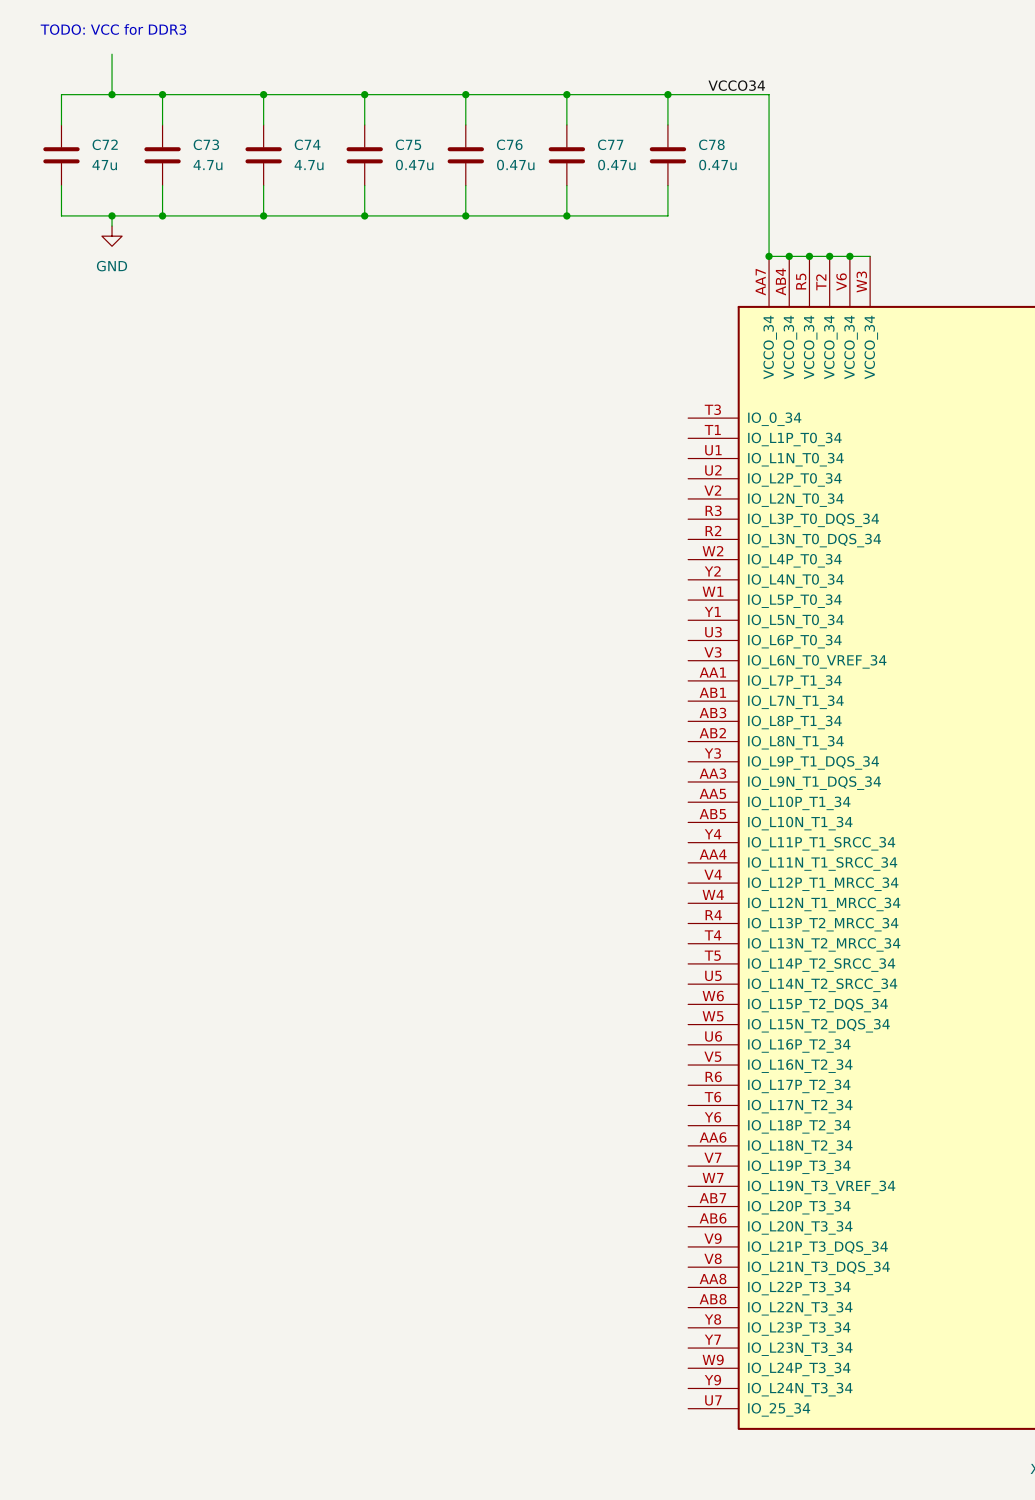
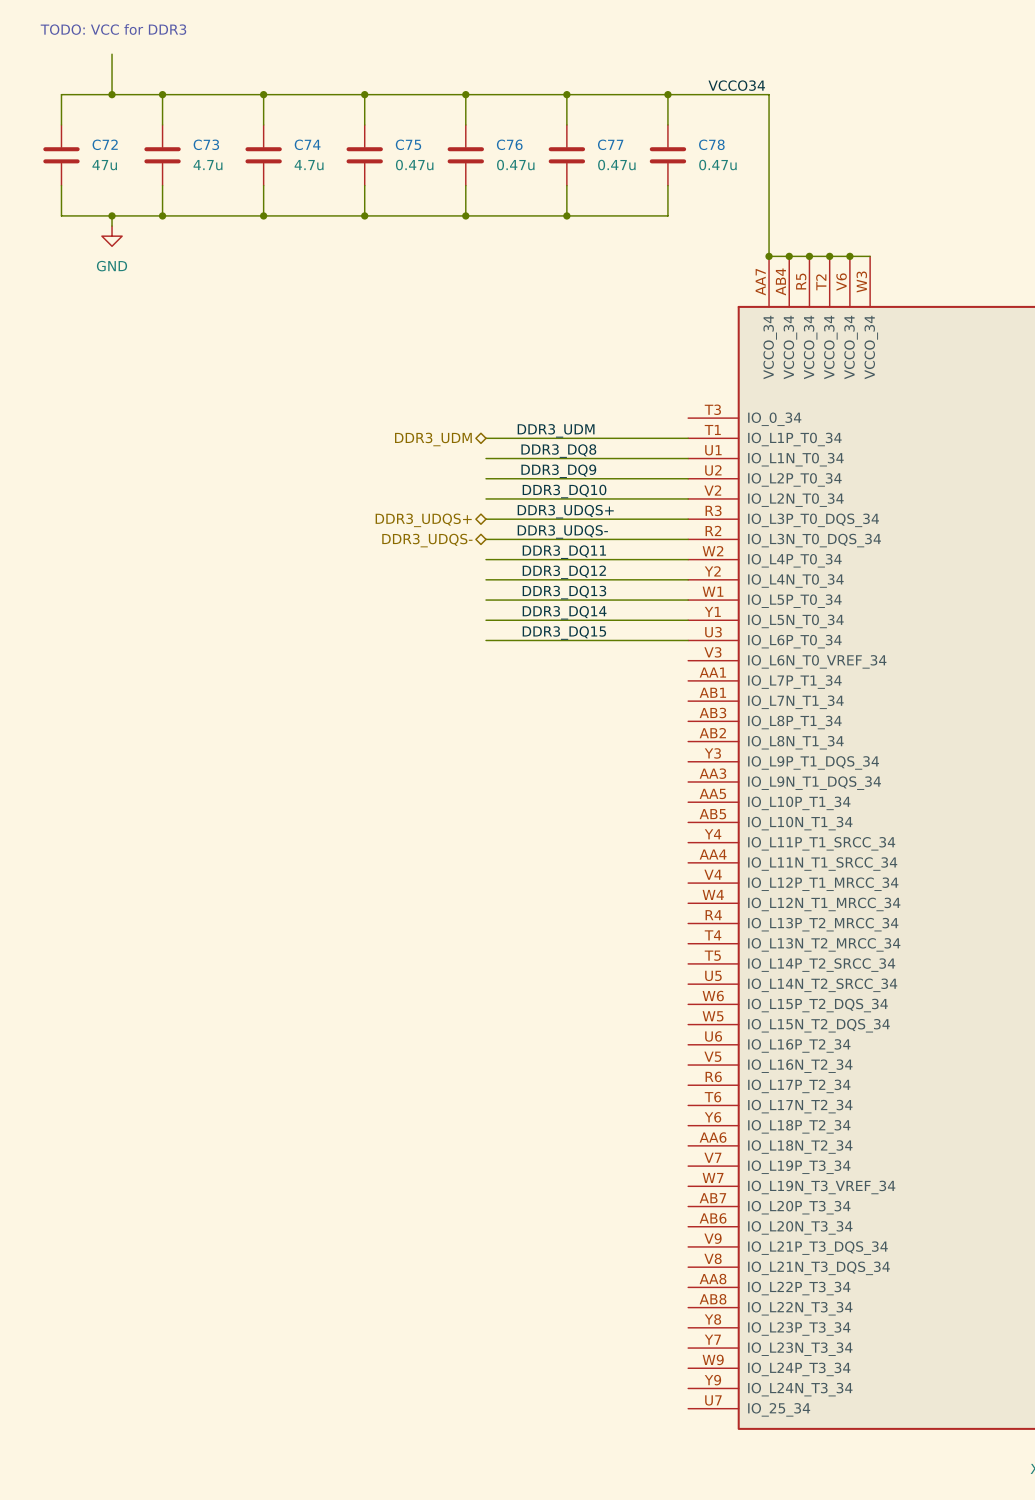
label: none -> DDR3_UDM (556, 430)
wire: none -> (486, 438) (688, 438)
hierarchical label: none -> DDR3_UDM (433, 439)
label: none -> DDR3_DQ8 (558, 451)
wire: none -> (486, 458) (688, 458)
label: none -> DDR3_DQ9 (558, 471)
wire: none -> (486, 478) (688, 478)
label: none -> DDR3_DQ10 (564, 491)
wire: none -> (486, 498) (688, 498)
label: none -> DDR3_UDQS+ (565, 511)
wire: none -> (486, 519) (688, 519)
hierarchical label: none -> DDR3_UDQS+ (423, 520)
label: none -> DDR3_UDQS- (562, 531)
wire: none -> (486, 539) (688, 539)
hierarchical label: none -> DDR3_UDQS- (427, 540)
label: none -> DDR3_DQ11 (564, 552)
wire: none -> (486, 559) (688, 559)
label: none -> DDR3_DQ12 (564, 572)
wire: none -> (486, 579) (688, 579)
label: none -> DDR3_DQ13 (564, 592)
wire: none -> (486, 600) (688, 600)
label: none -> DDR3_DQ14 (564, 612)
wire: none -> (486, 620) (688, 620)
label: none -> DDR3_DQ15 (564, 633)
wire: none -> (486, 640) (688, 640)

